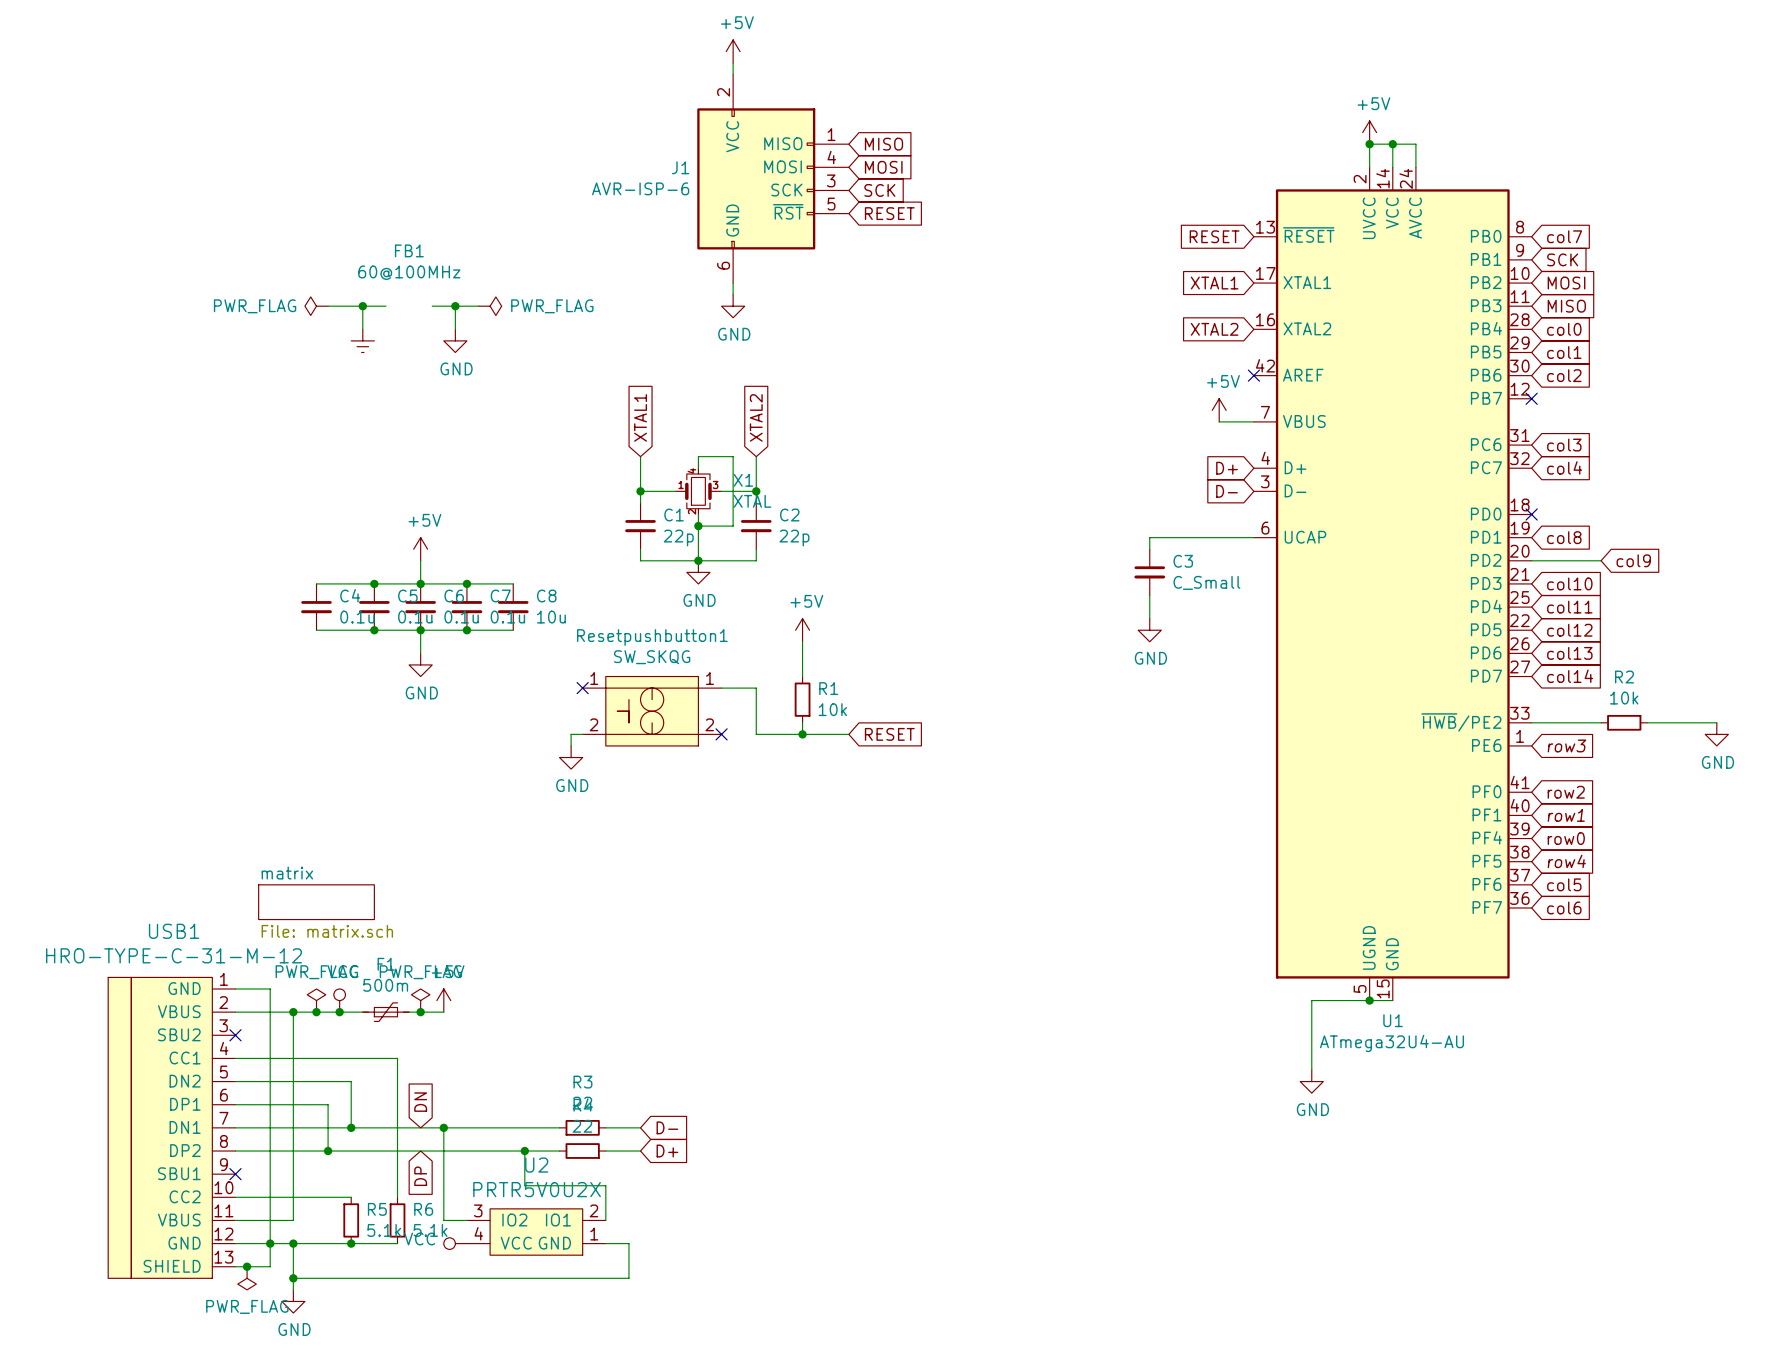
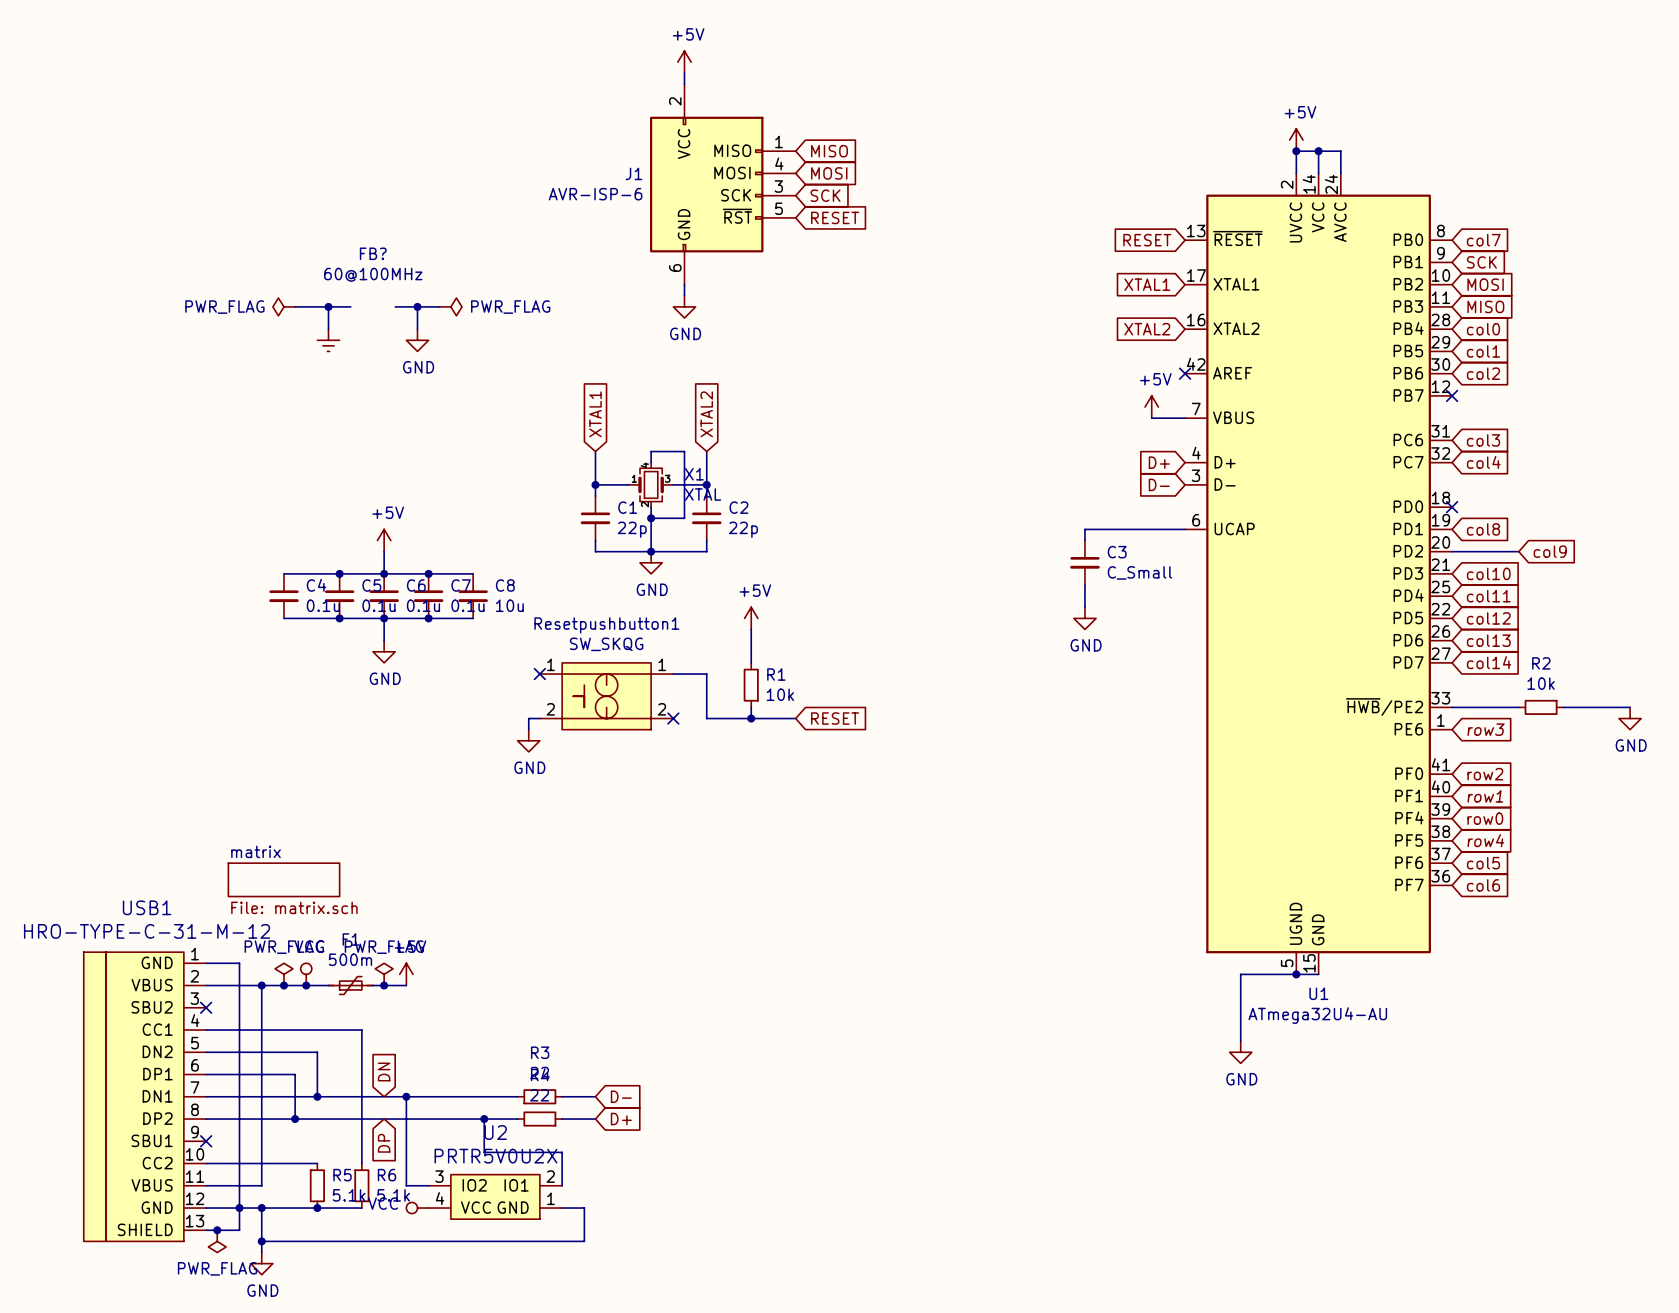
FB1 name: FB1 (409, 250) -> FB? (373, 253)

